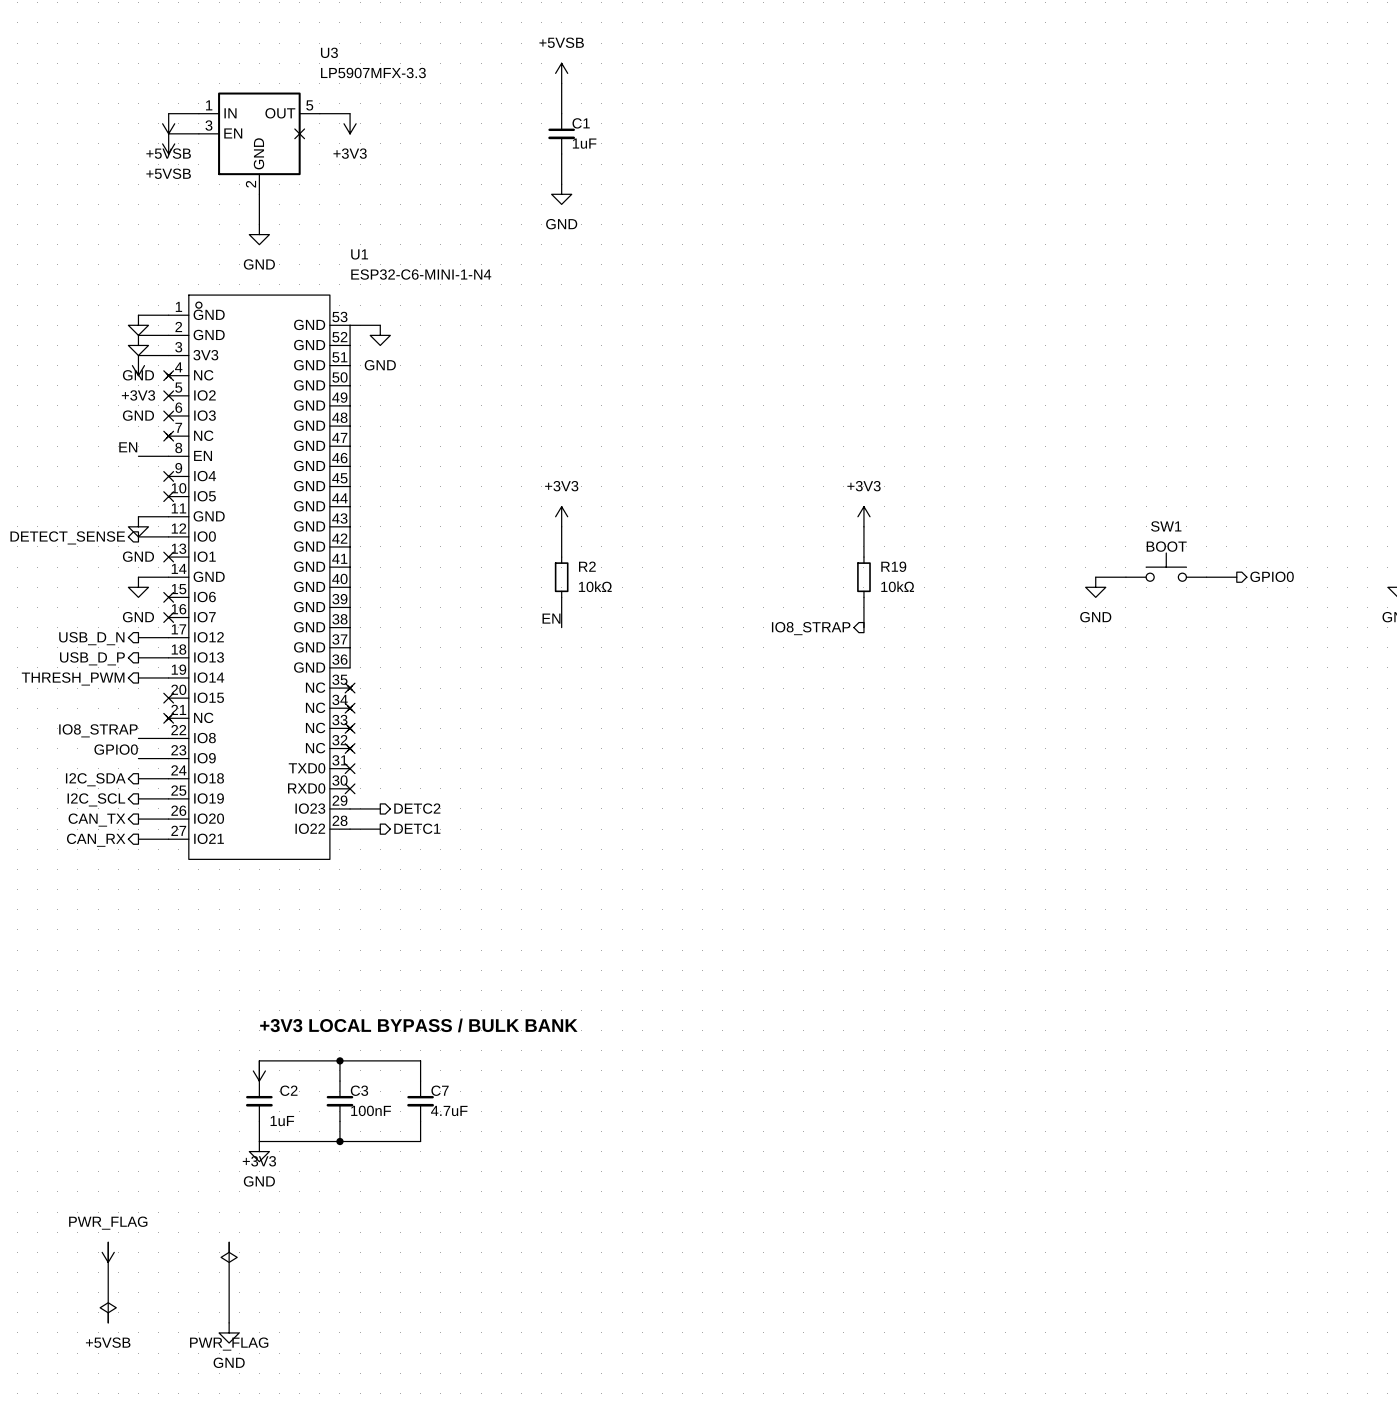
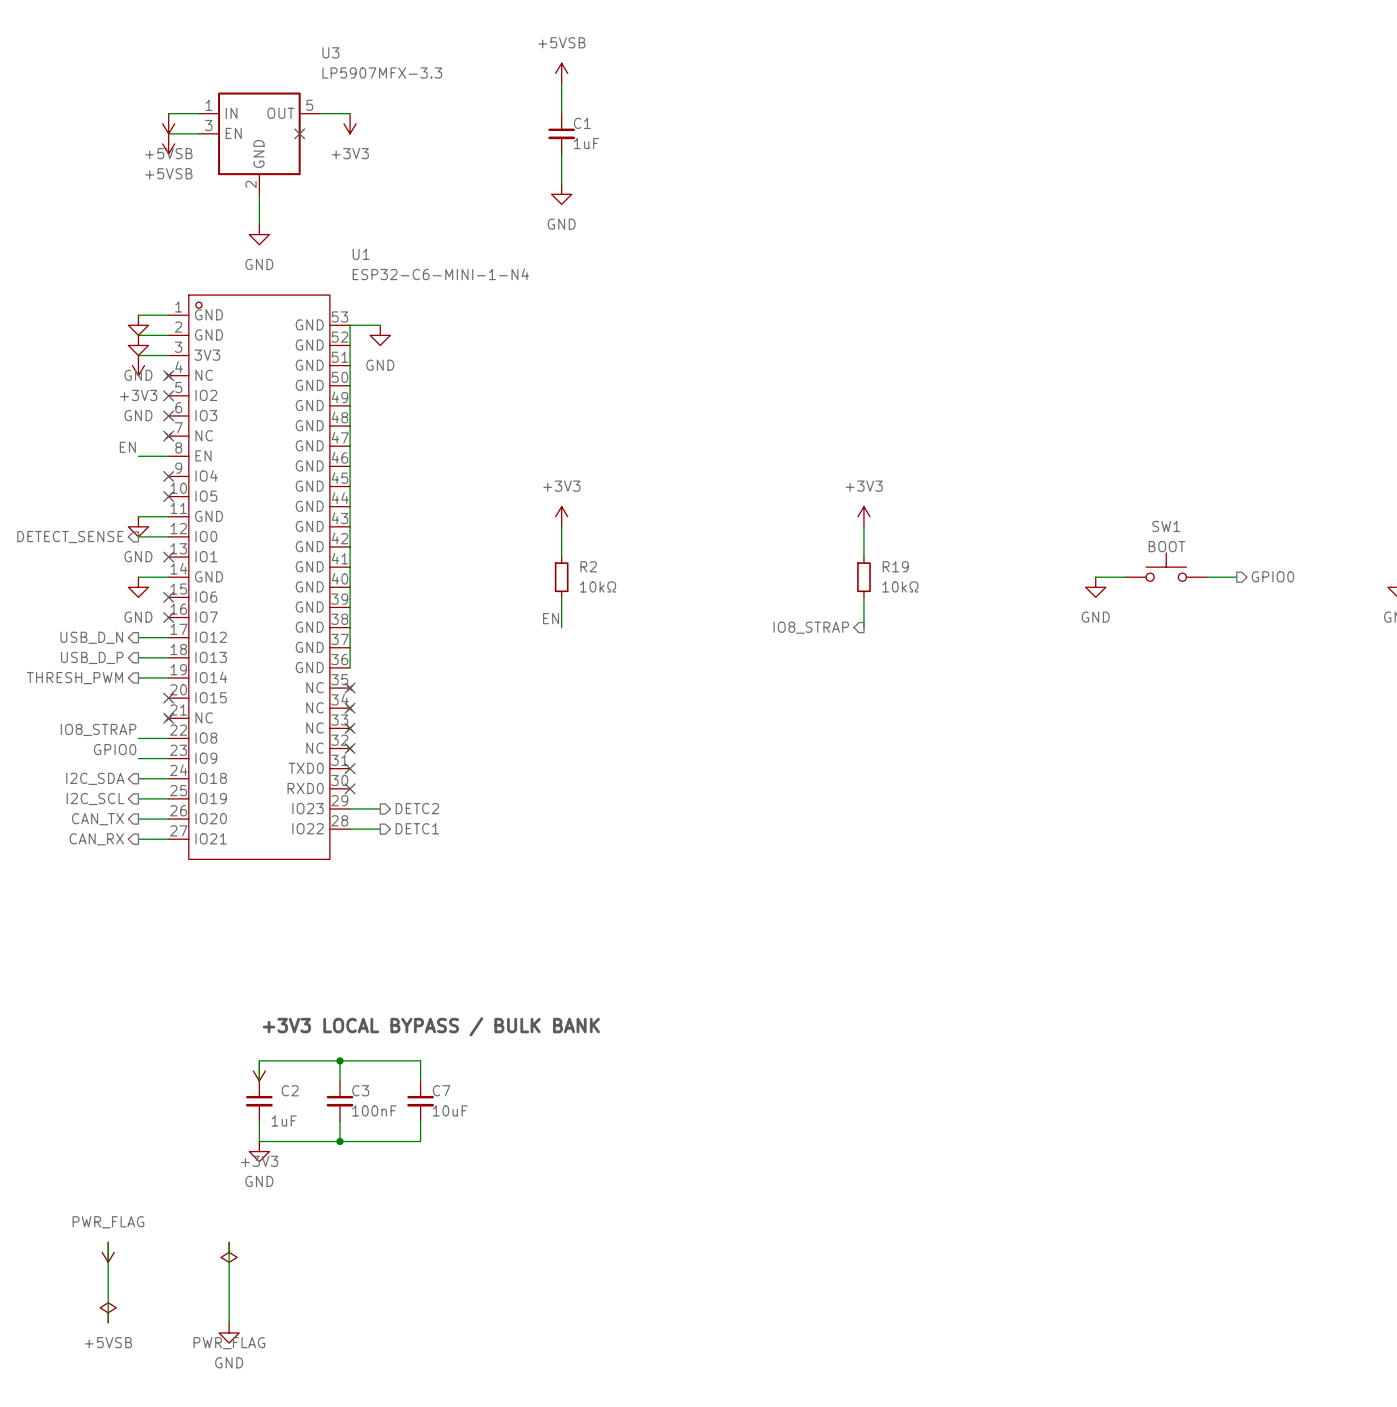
C7 value: 4.7uF (449, 1110) -> 10uF (450, 1110)

